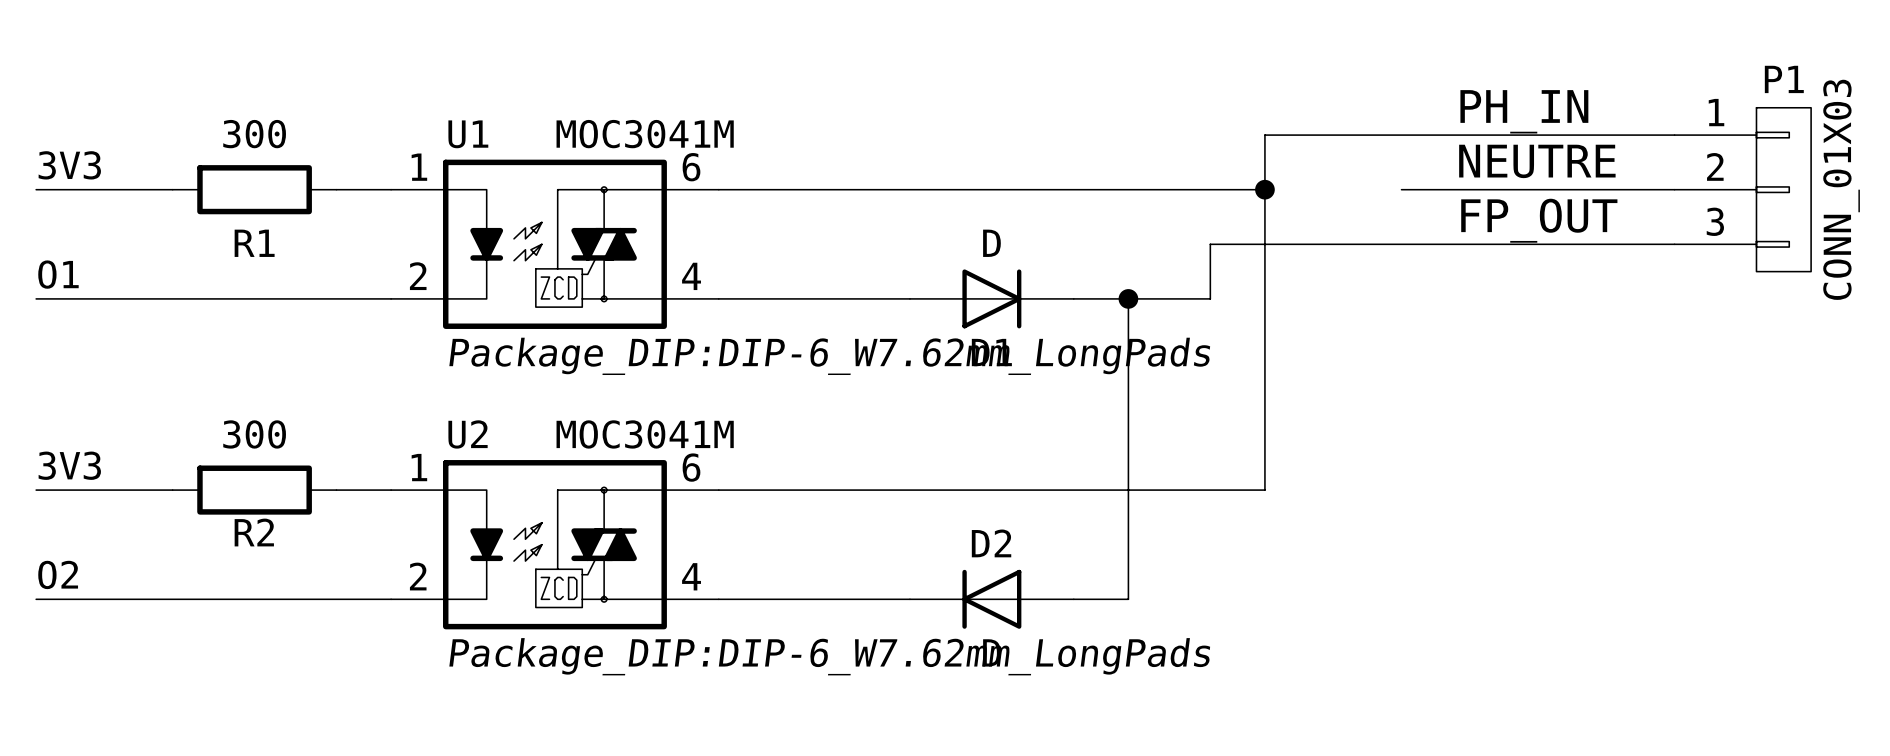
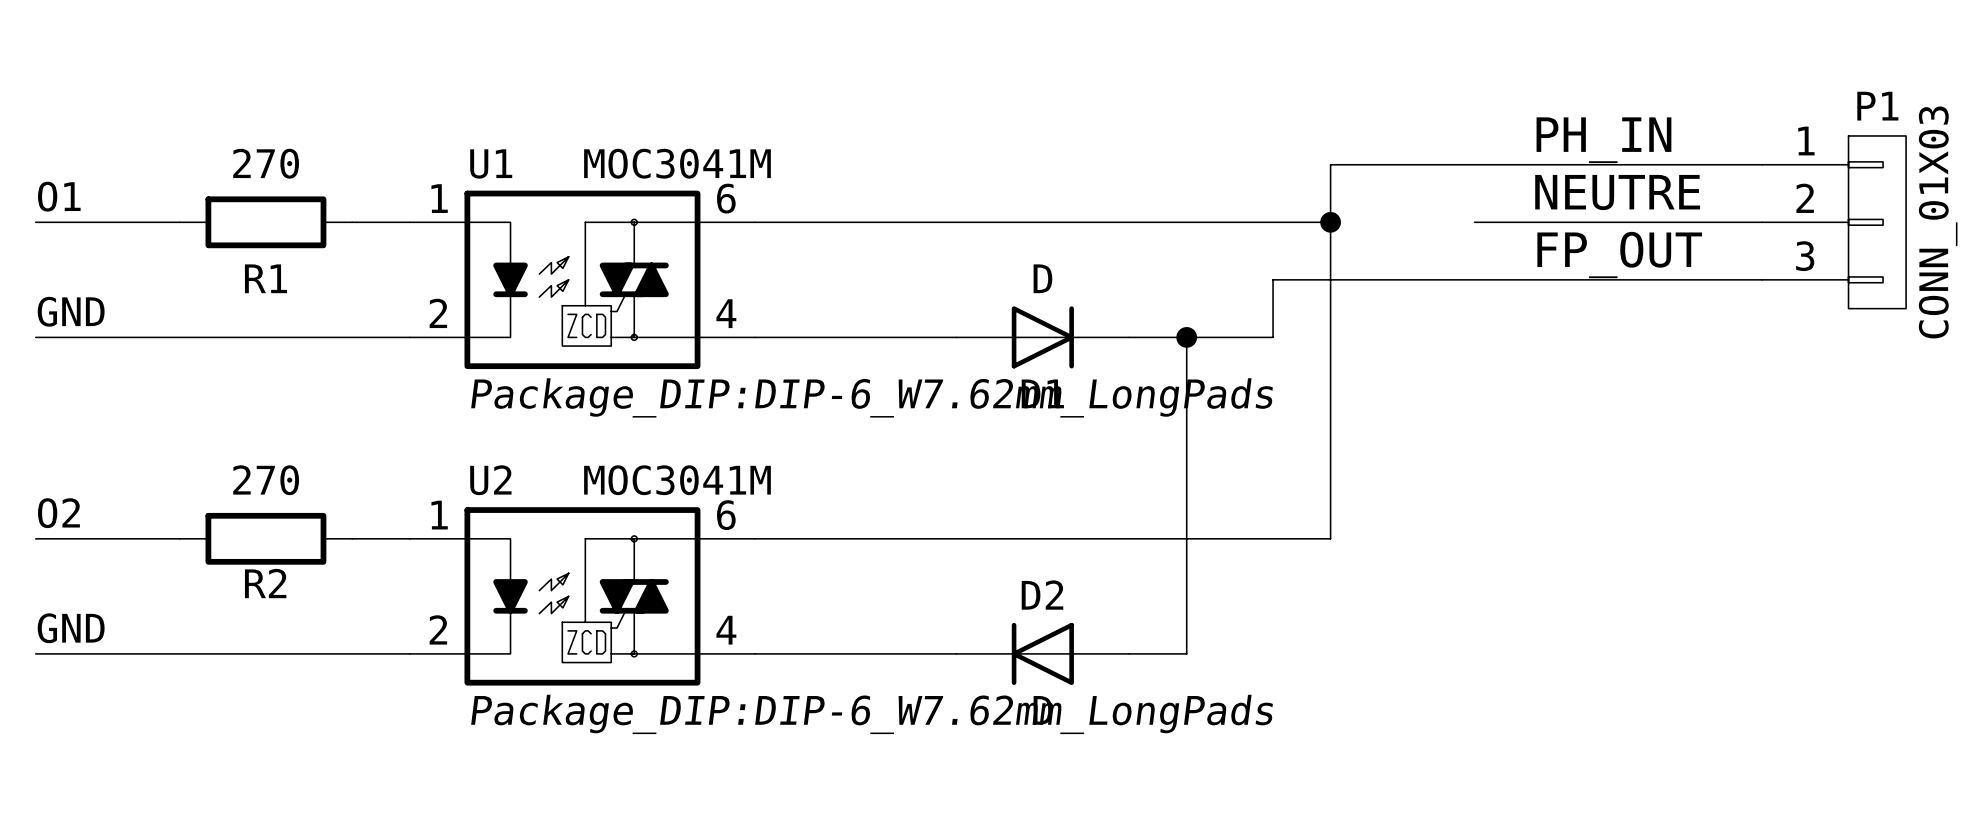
R1 value: 300 (254, 134) -> 270 (266, 163)
label: 3V3 (69, 165) -> O1 (59, 196)
label: O1 (58, 274) -> GND (71, 311)
R2 value: 300 (254, 434) -> 270 (266, 480)
label: 3V3 (69, 465) -> O2 (58, 513)
label: O2 (58, 574) -> GND (71, 628)

